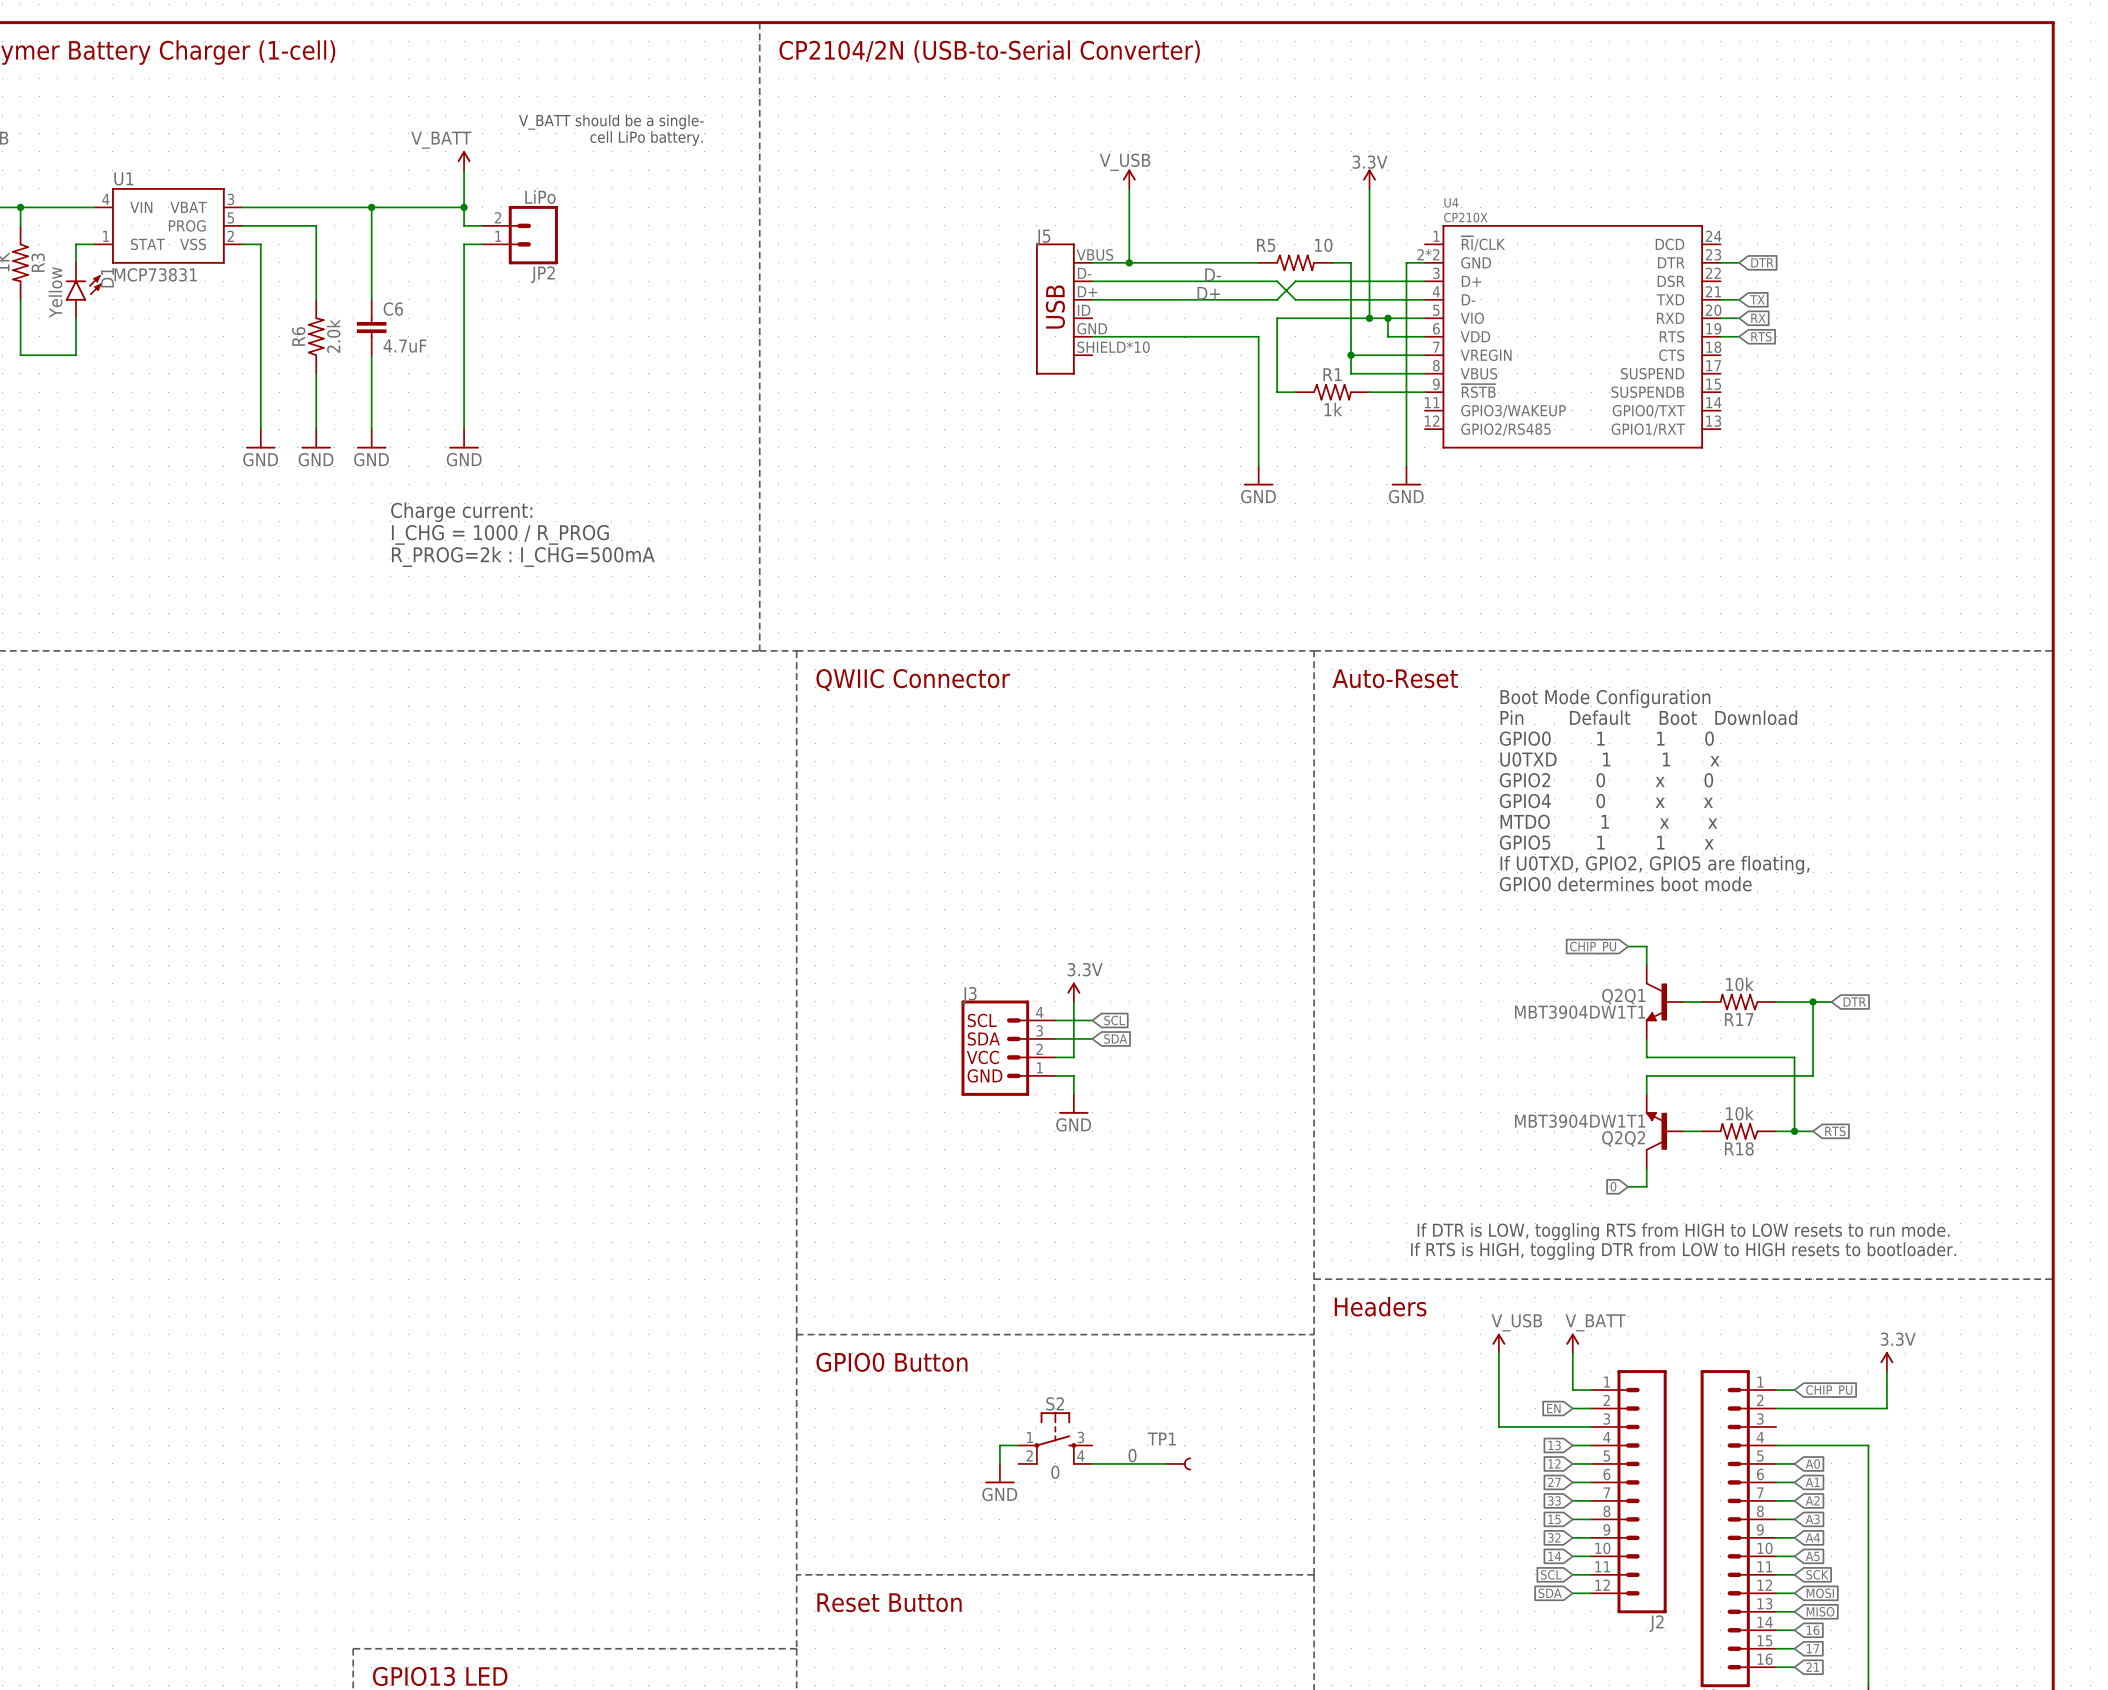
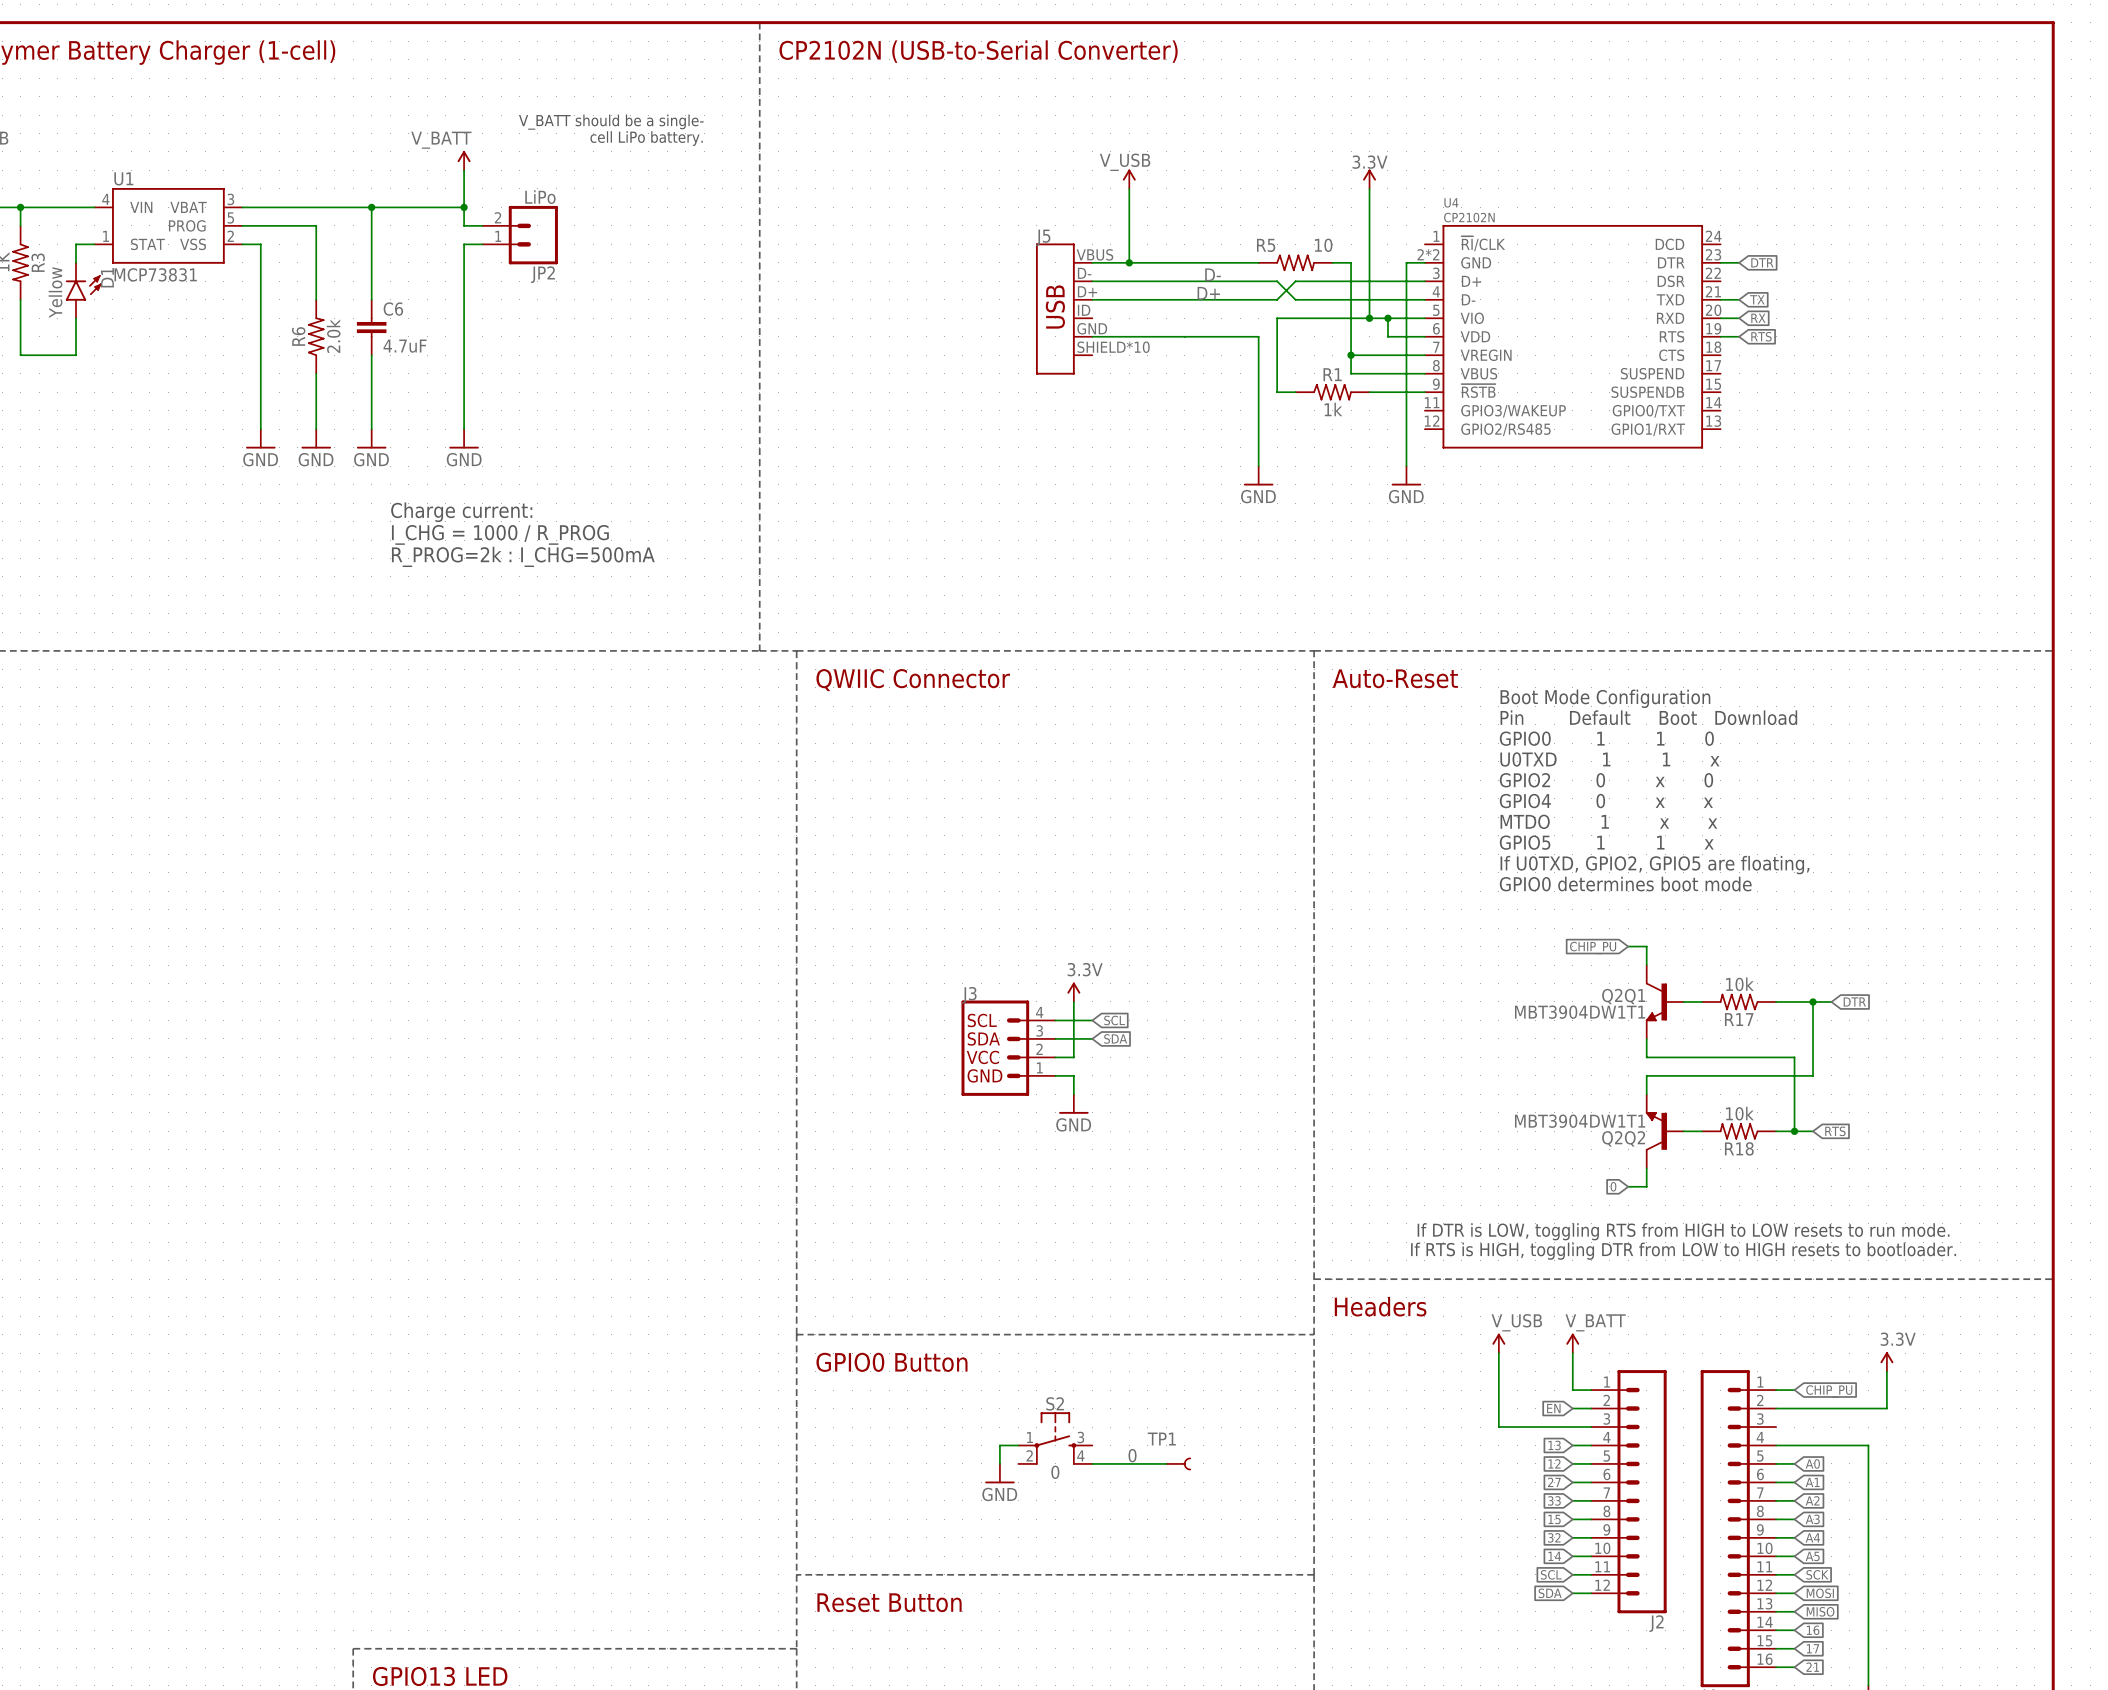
text: CP2104/2N (USB-to-Serial Converter) (989, 51) -> CP2102N (USB-to-Serial Converter) (978, 51)
U4 value: CP210X (1465, 217) -> CP2102N (1469, 217)

